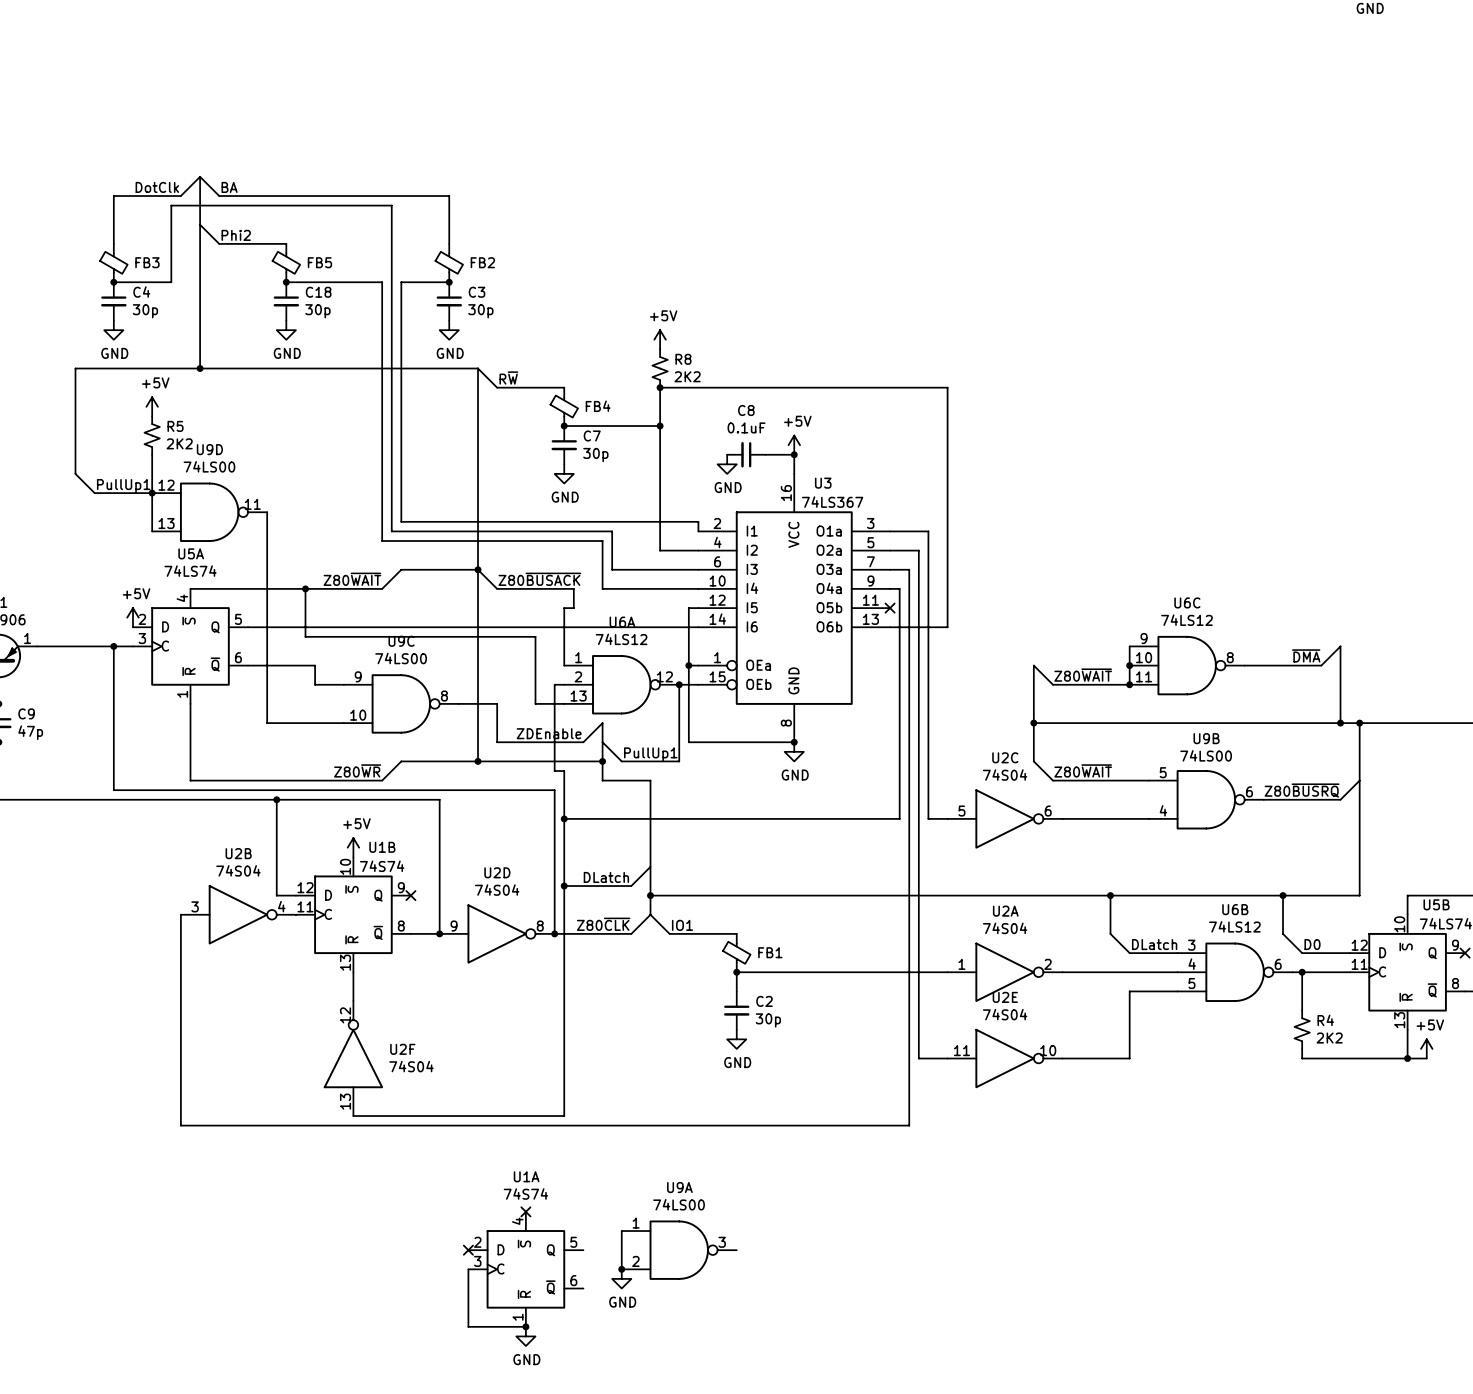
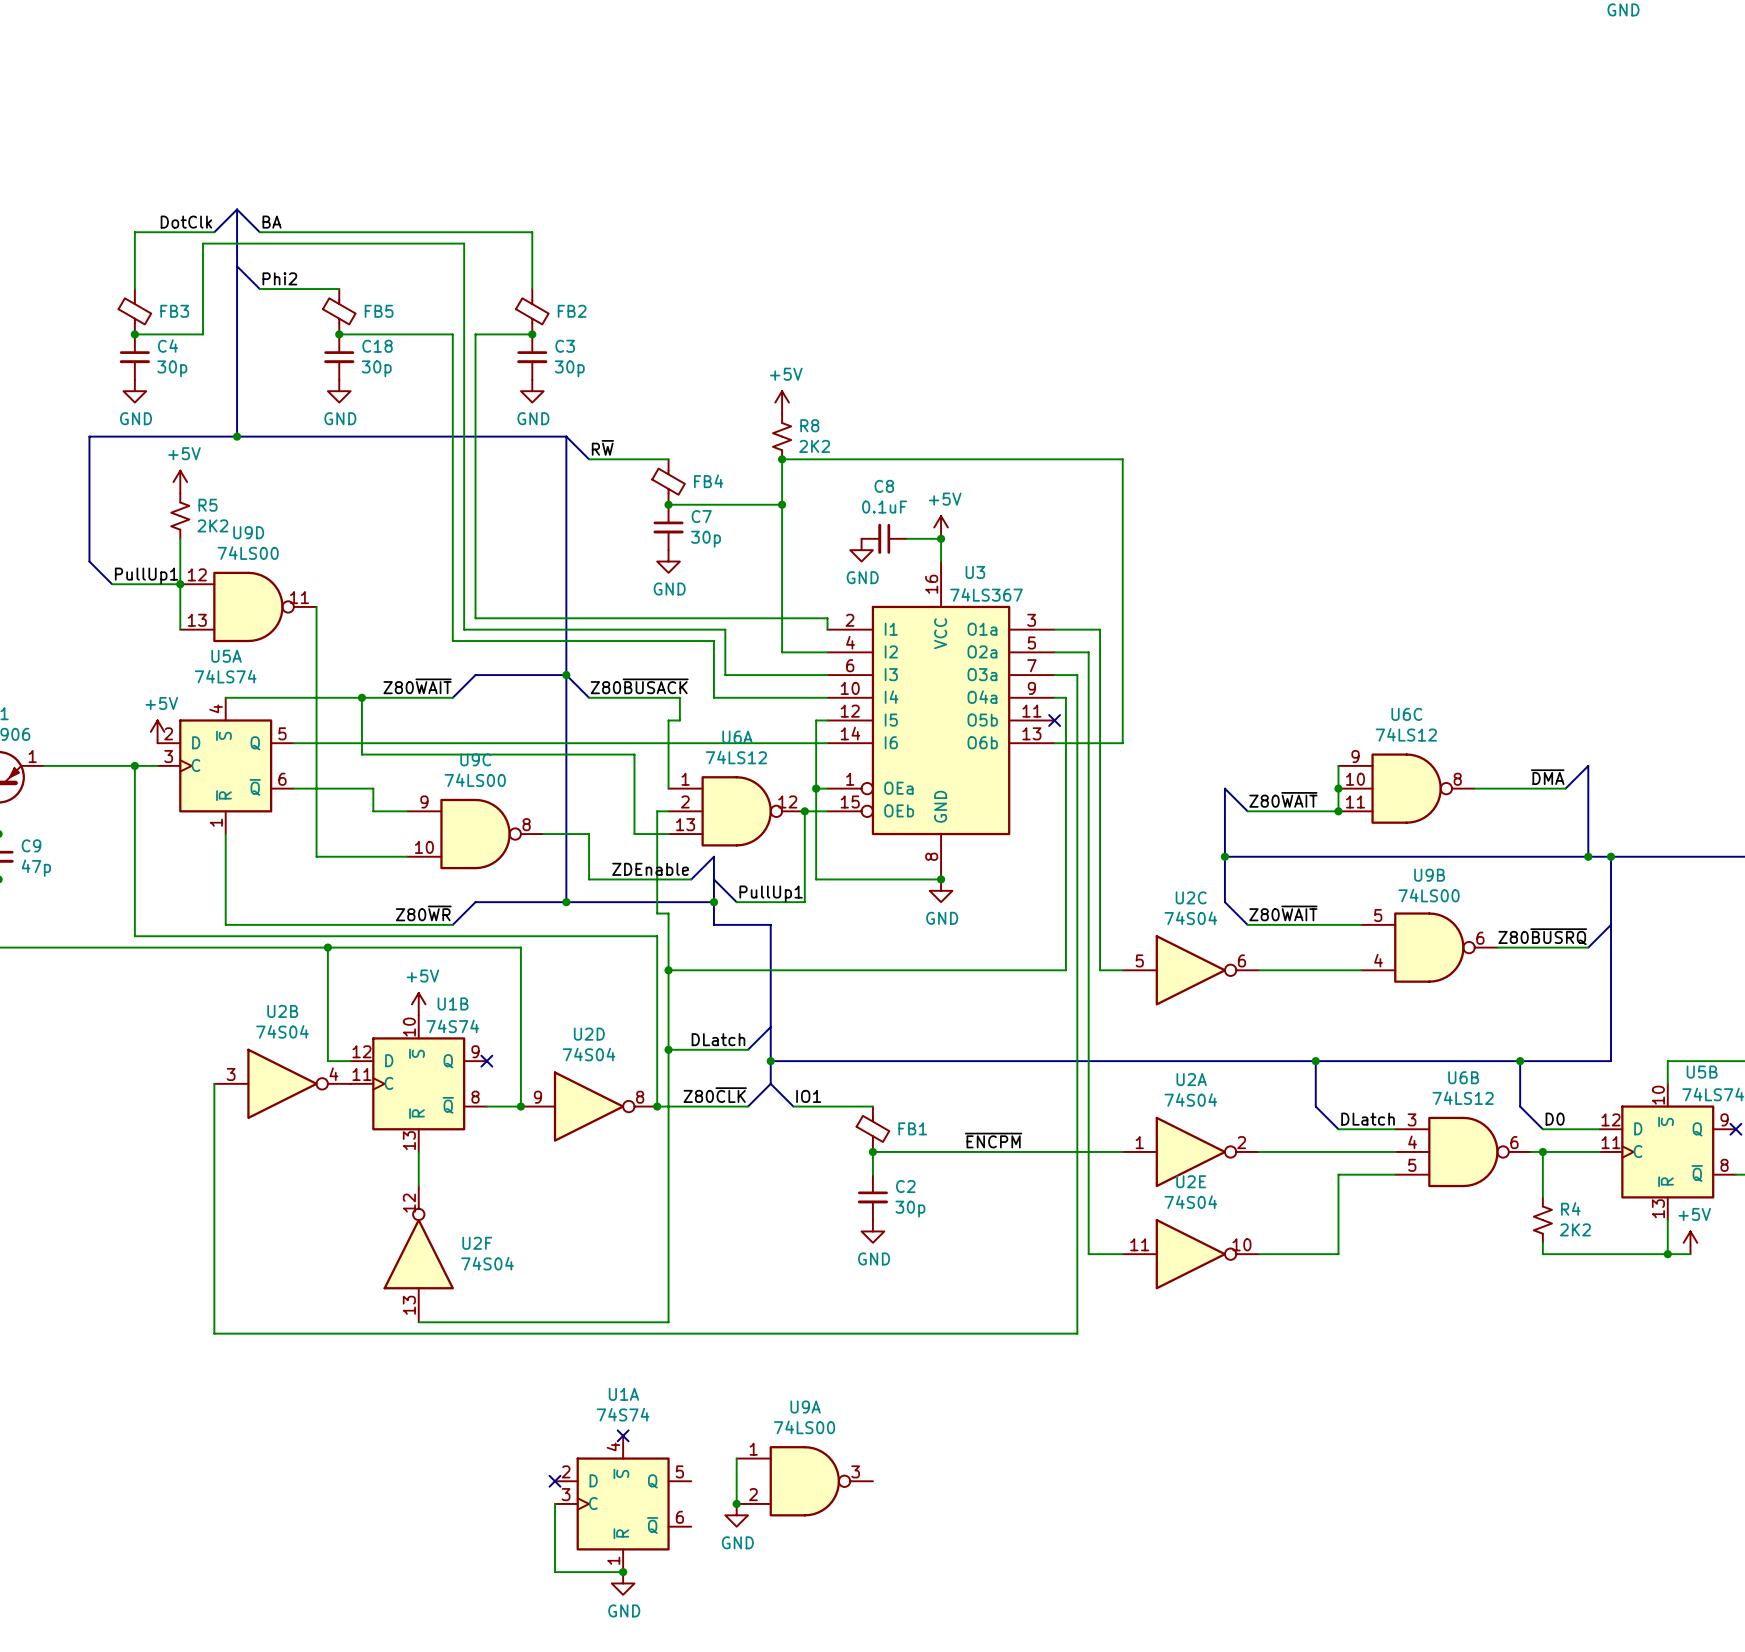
label: none -> ~{ENCPM} (993, 1140)

